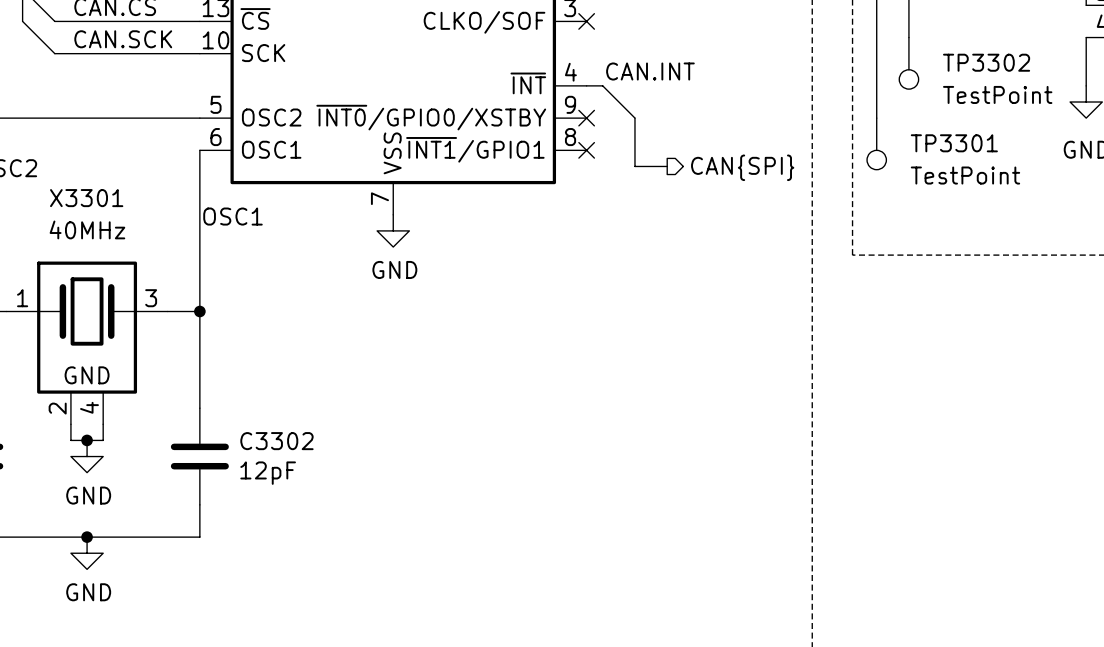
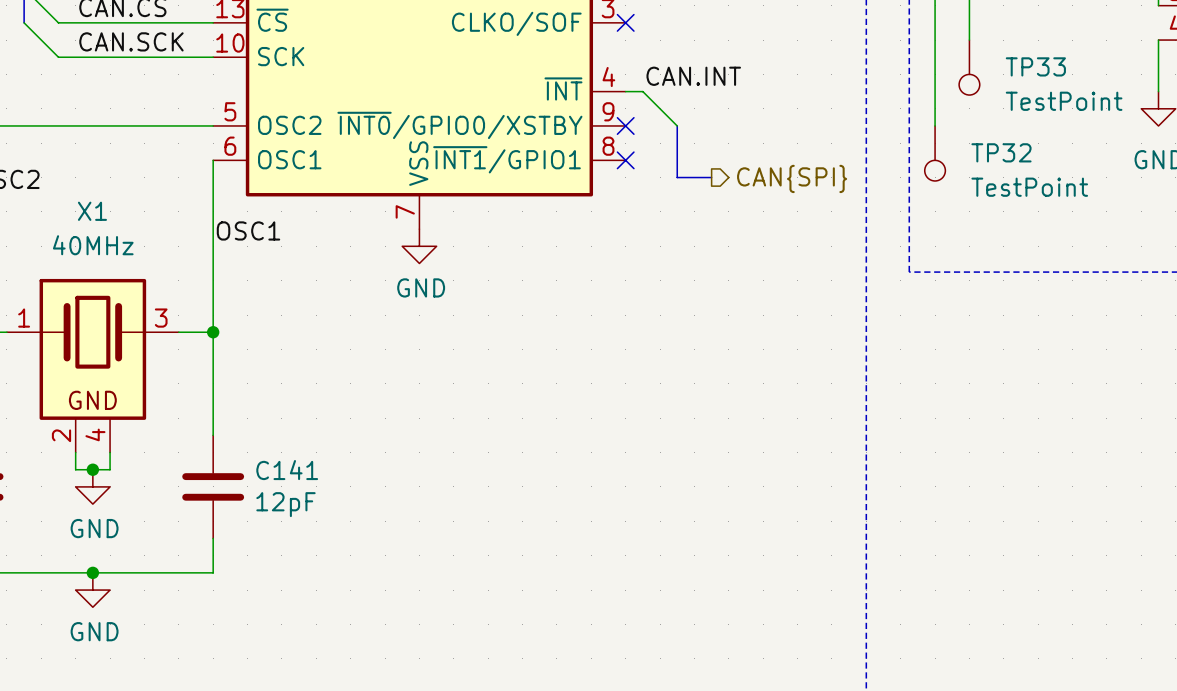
TP3302 name: TP3302 (986, 62) -> TP33 (1035, 66)
TP3301 name: TP3301 (954, 143) -> TP32 (1001, 152)
X3301 name: X3301 (86, 198) -> X1 (92, 211)
C3302 name: C3302 (276, 441) -> C141 (287, 470)

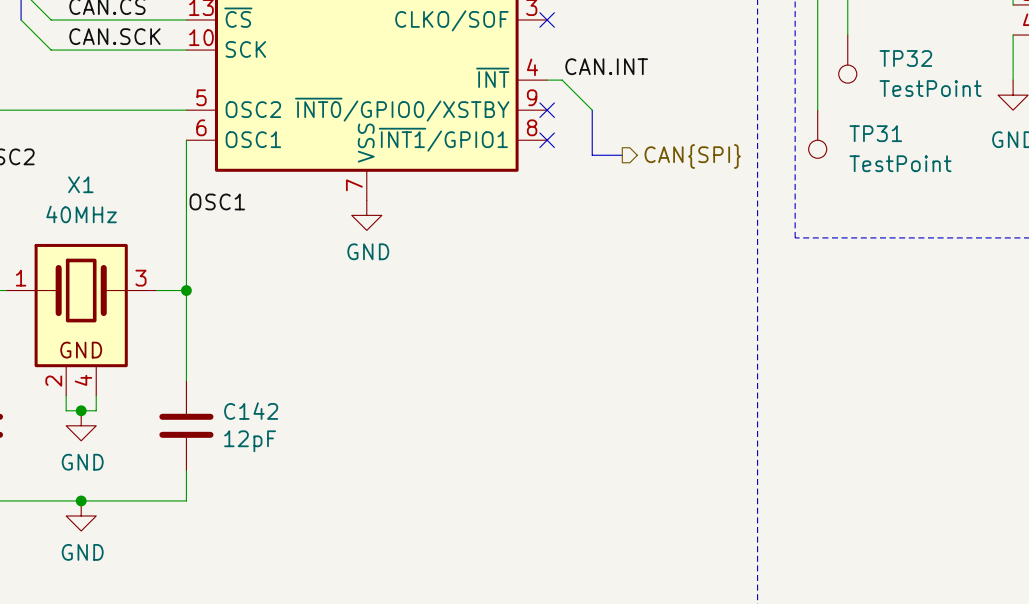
TP33 name: TP33 (1035, 66) -> TP32 (905, 58)
TP32 name: TP32 (1001, 152) -> TP31 (875, 133)
C141 name: C141 (287, 470) -> C142 (251, 411)

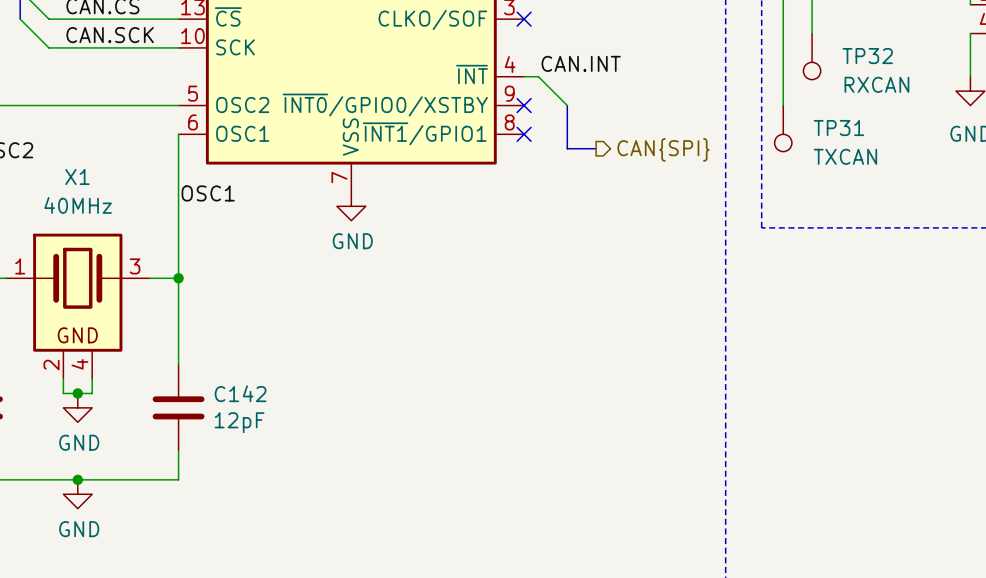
TP32 value: TestPoint (930, 88) -> RXCAN (876, 84)
TP31 value: TestPoint (900, 163) -> TXCAN (845, 156)

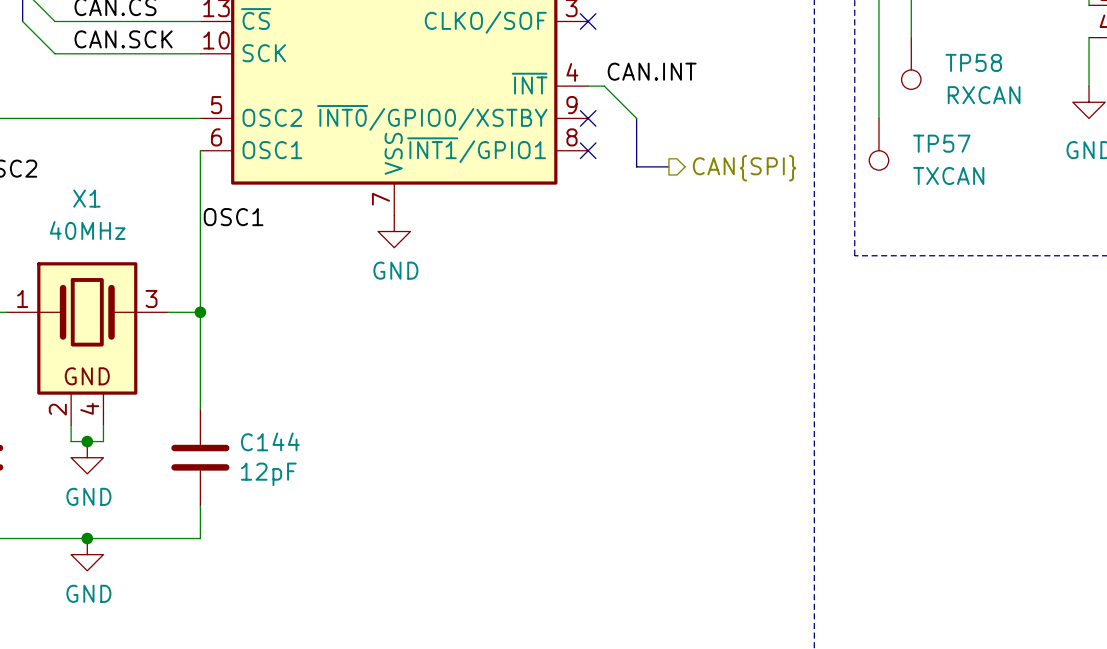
TP32 name: TP32 (867, 56) -> TP58 (973, 62)
TP31 name: TP31 (838, 128) -> TP57 (941, 143)
C142 name: C142 (240, 393) -> C144 (270, 441)

